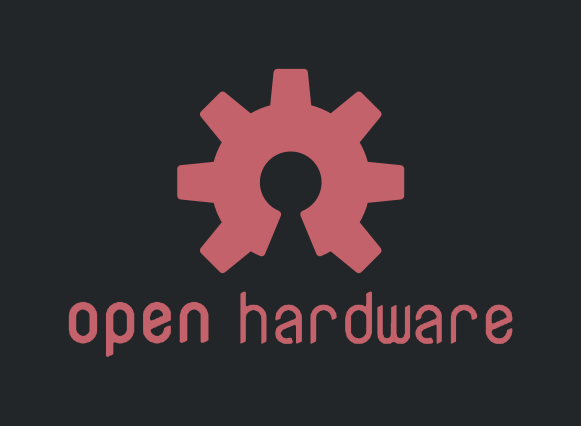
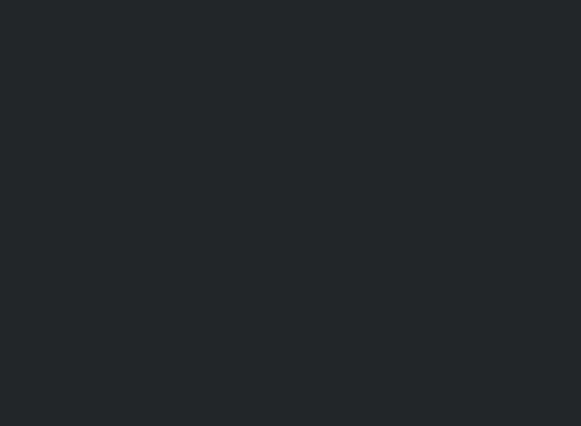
part: (290, 212) -> none

